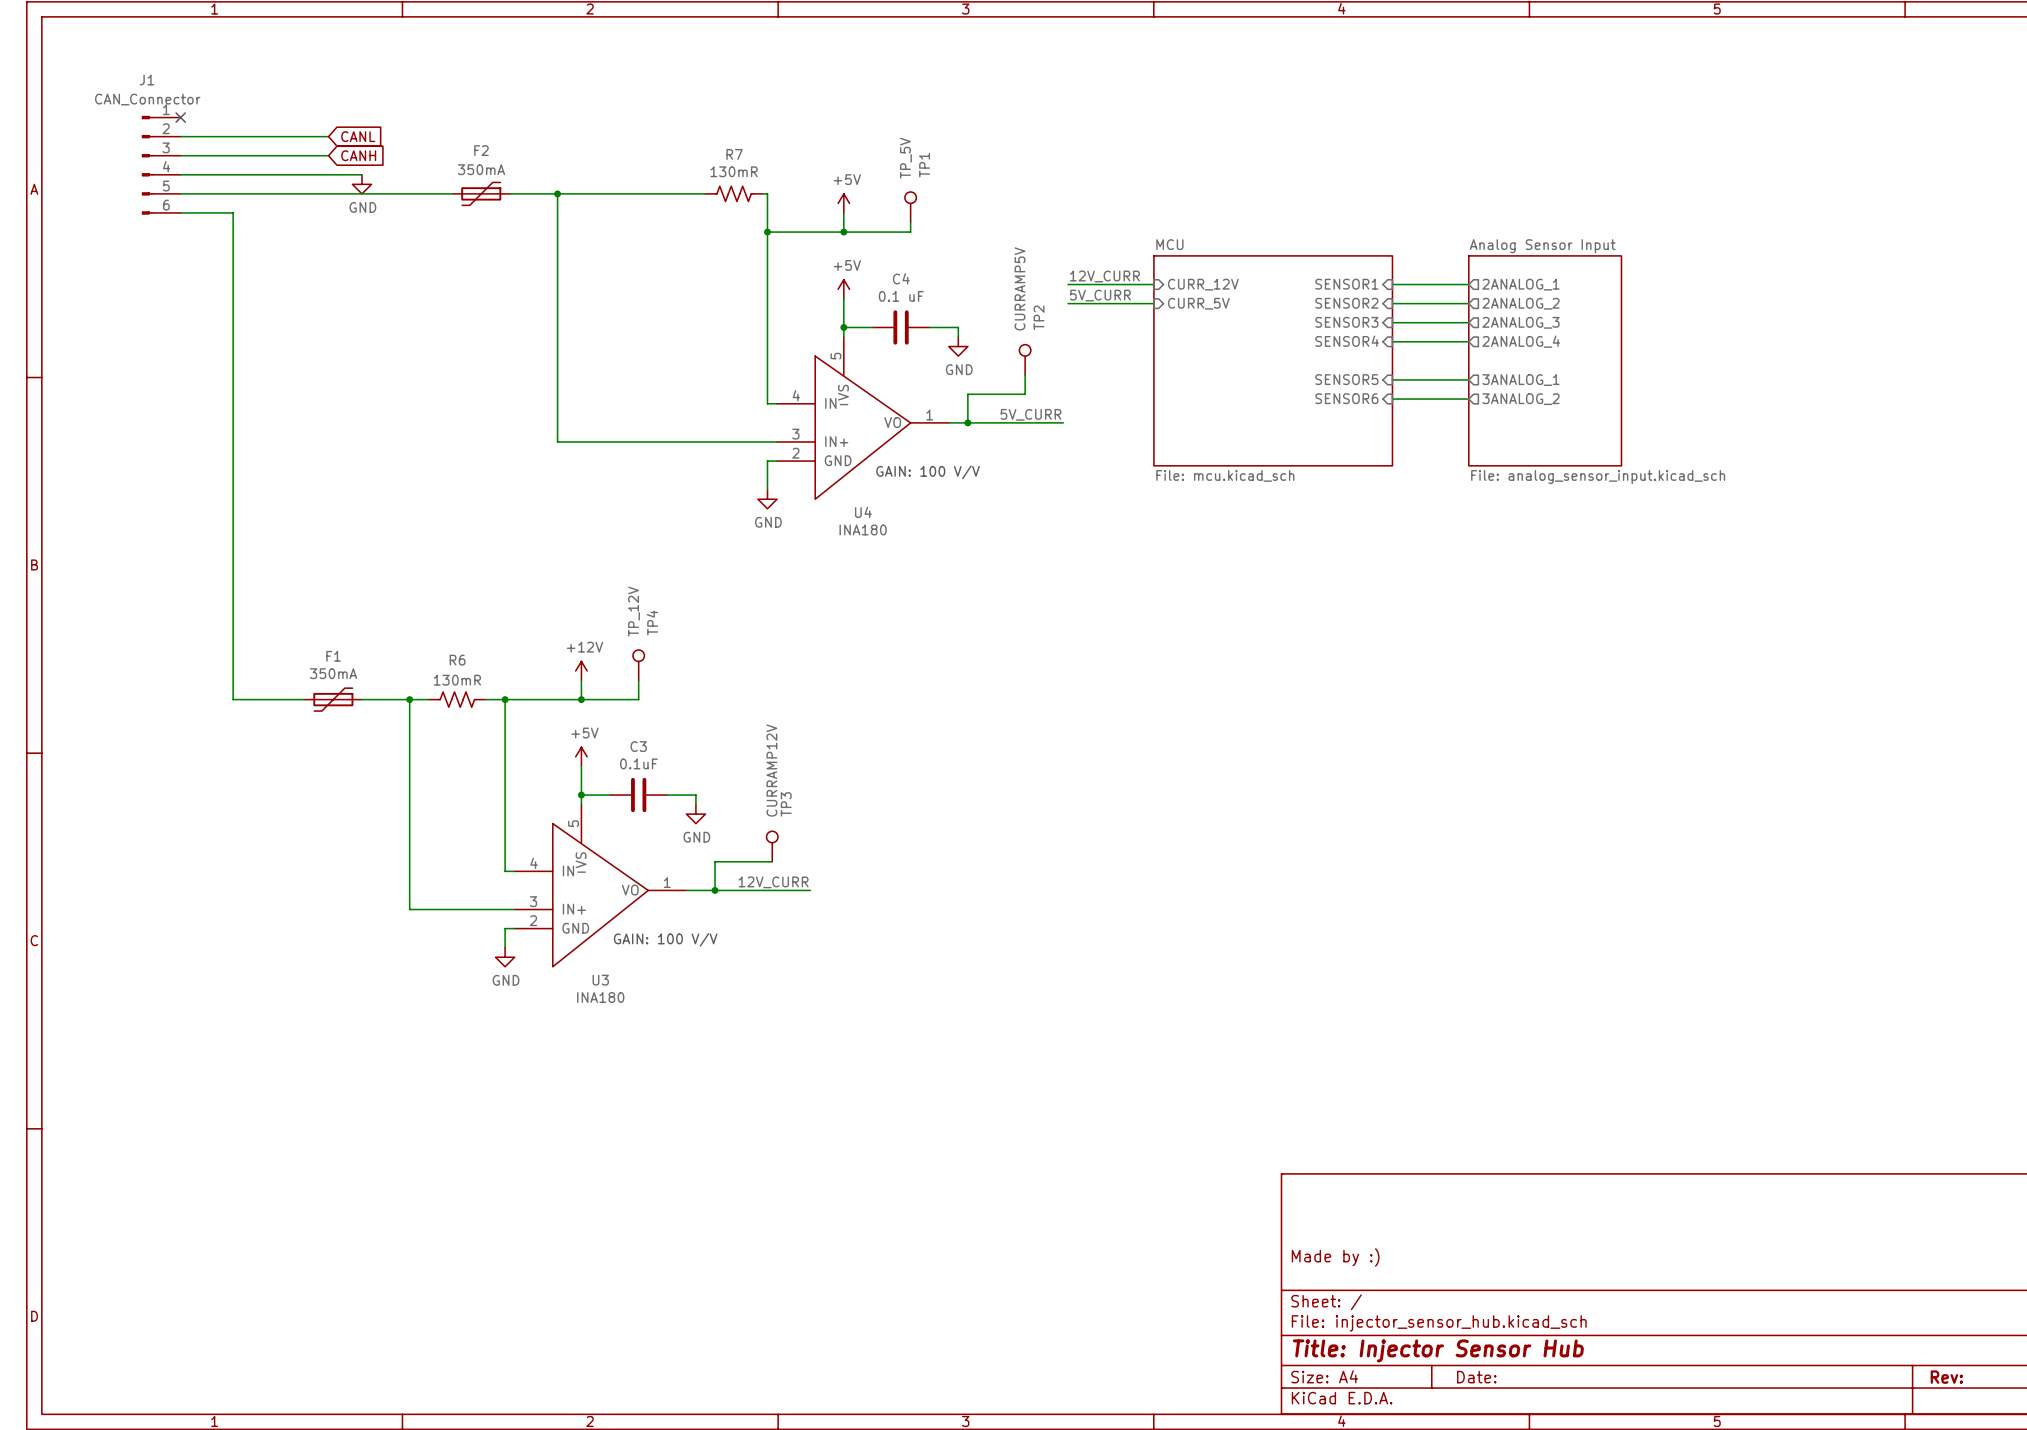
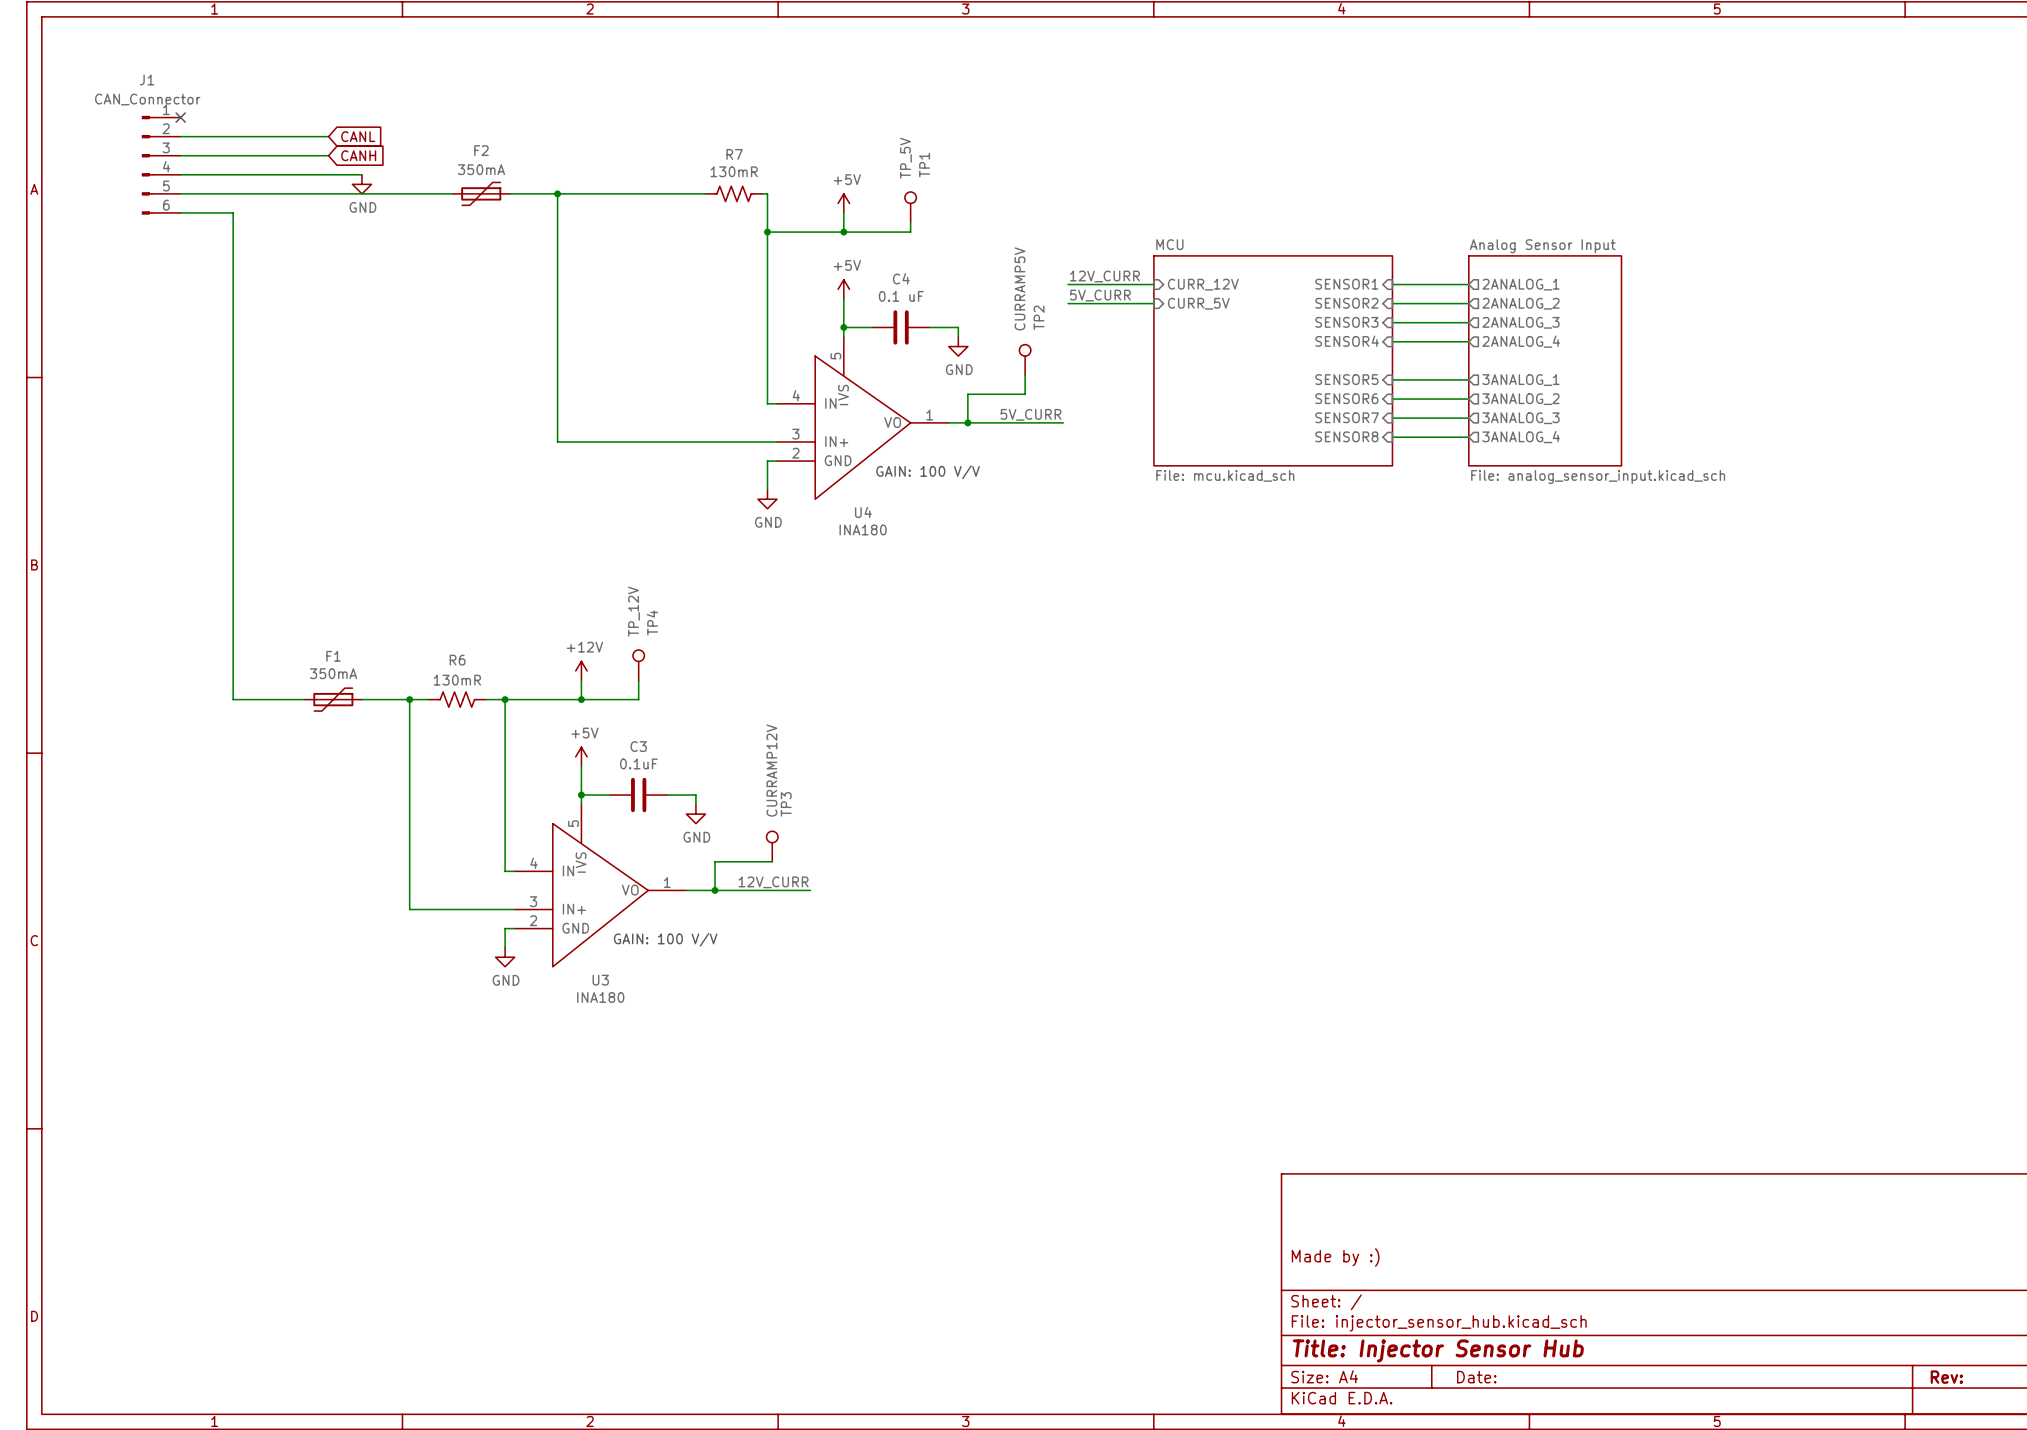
sheet pin: none -> SENSOR7 (1347, 417)
wire: none -> (1392, 418) (1468, 418)
sheet pin: none -> 3ANALOG_3 (1520, 418)
sheet pin: none -> SENSOR8 (1346, 436)
wire: none -> (1392, 437) (1468, 437)
sheet pin: none -> 3ANALOG_4 (1521, 437)

